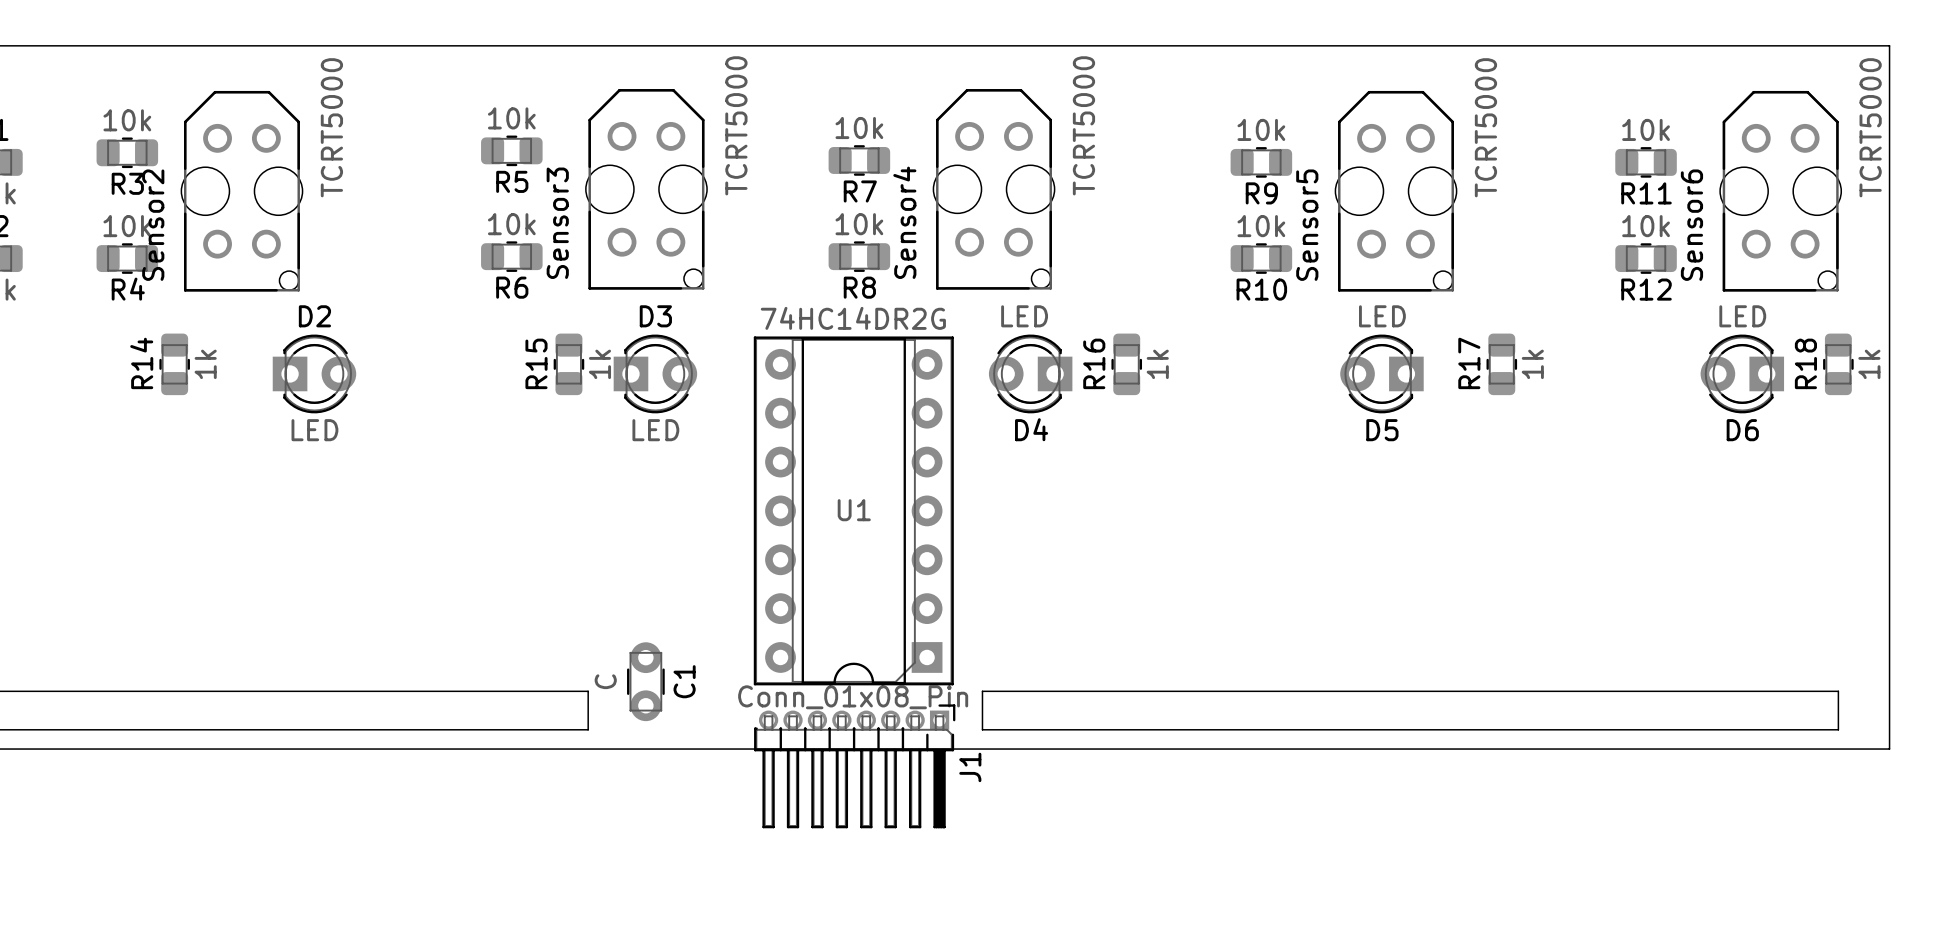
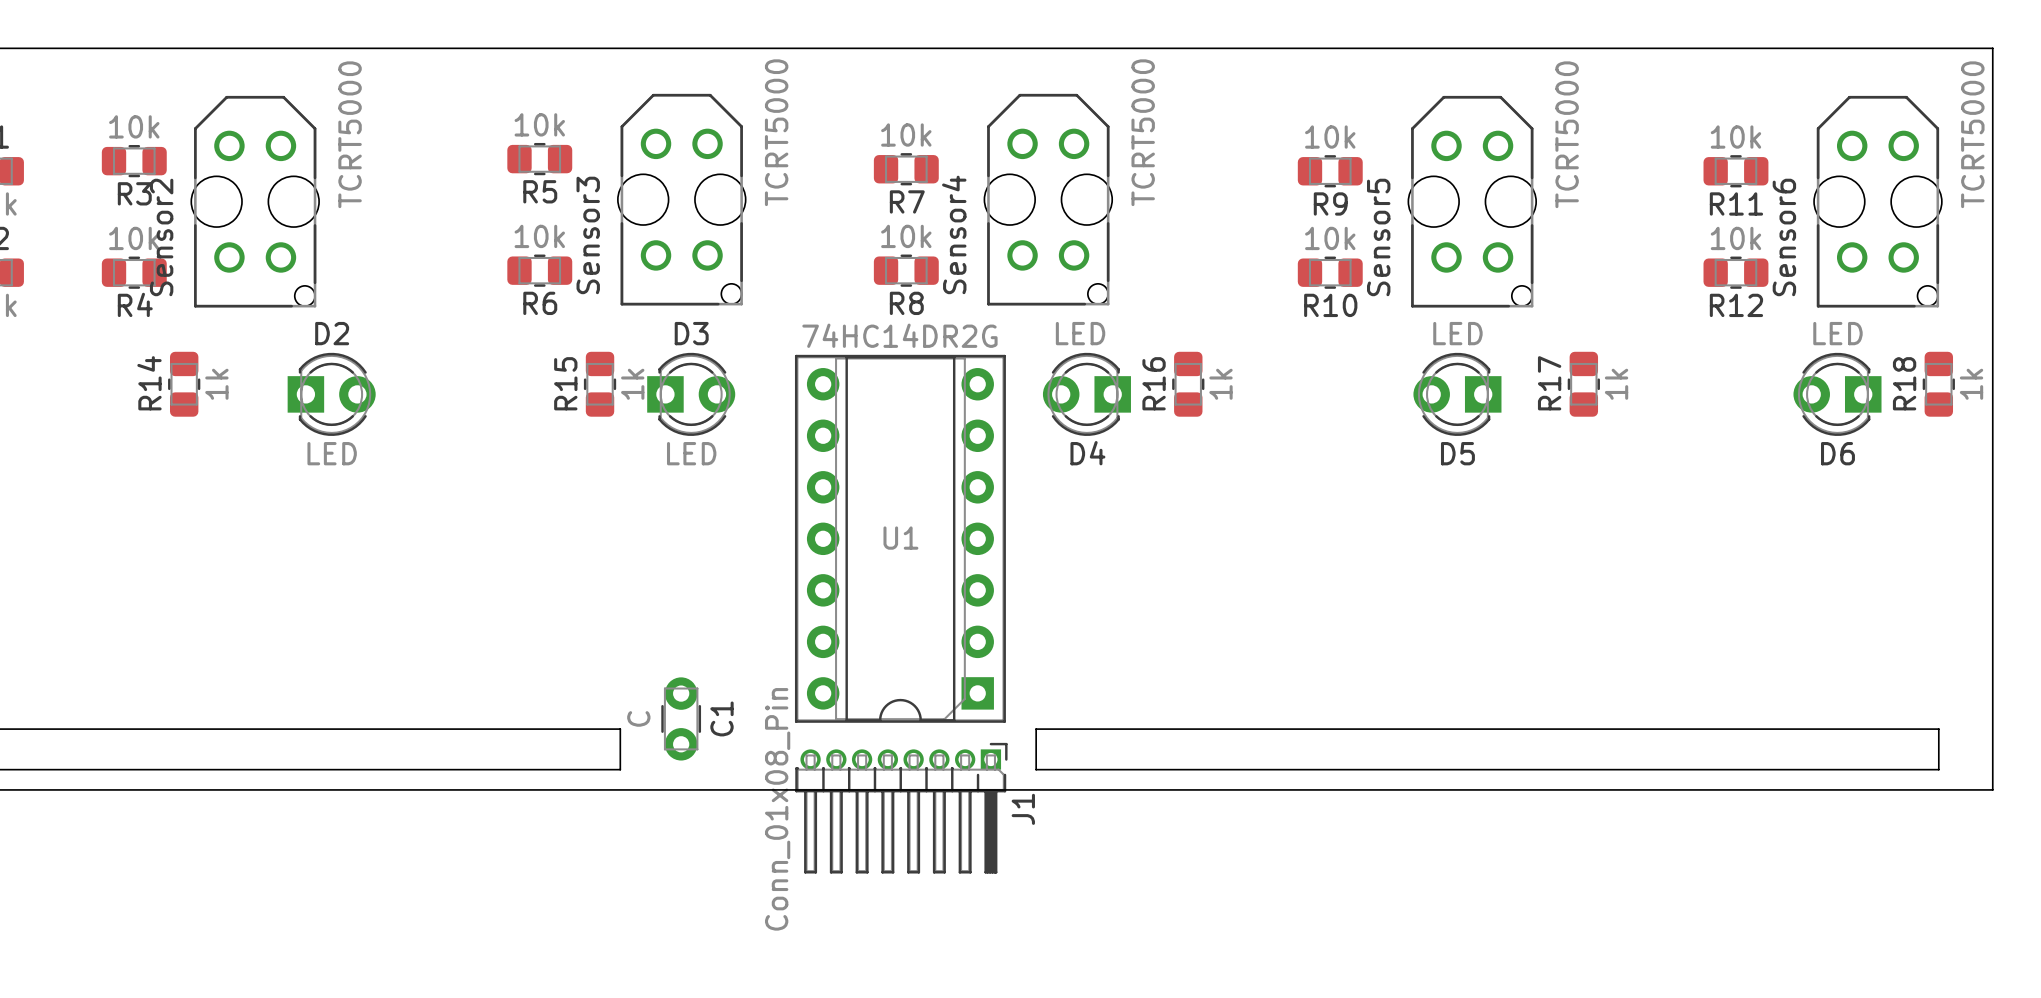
J1 value rotation: 0° (853, 697) -> 90° counterclockwise (777, 809)

